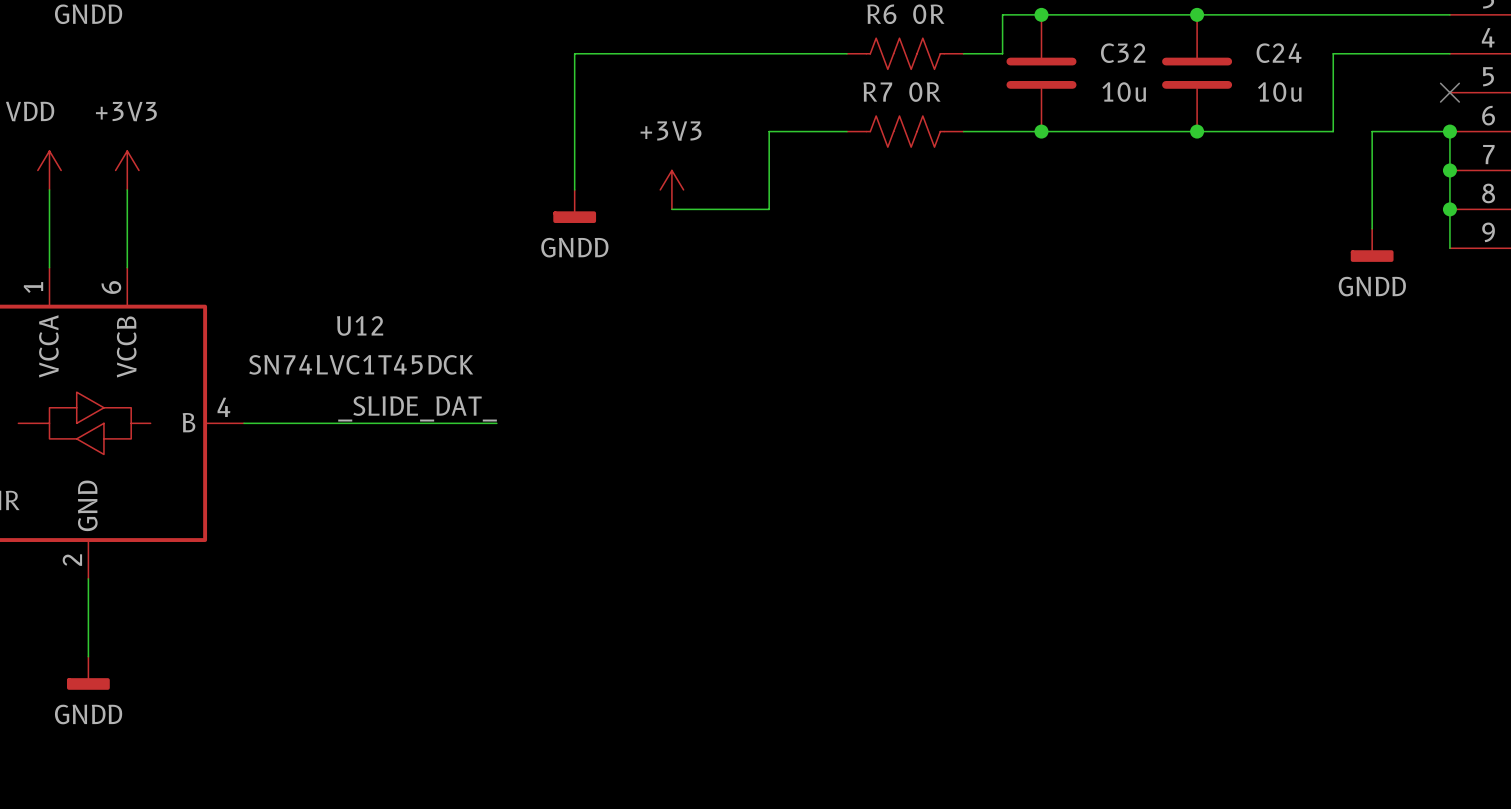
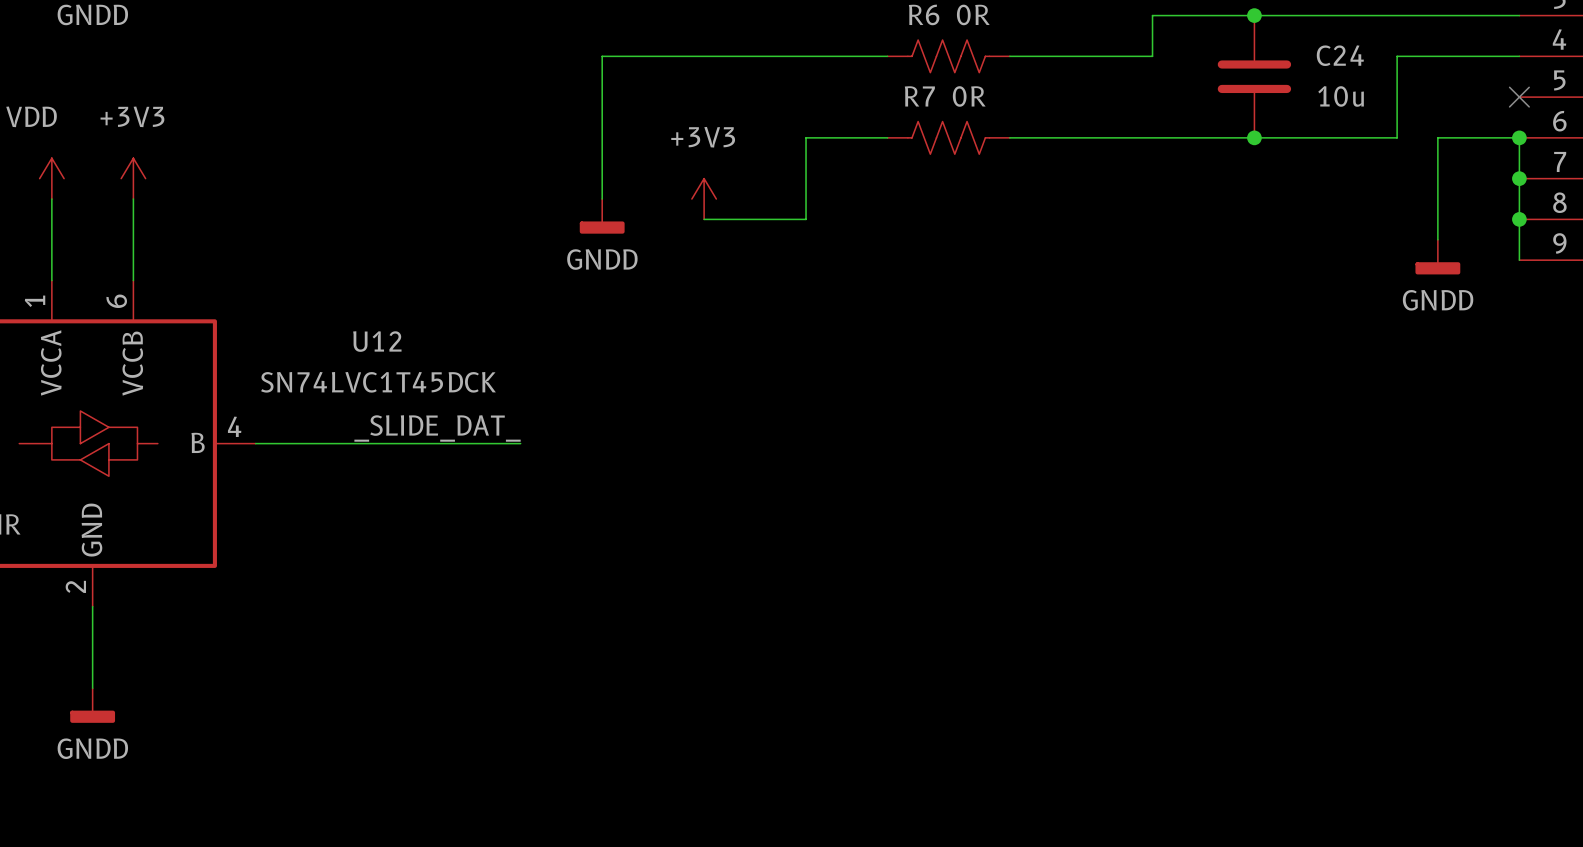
junction: (1041, 14) -> none
wire: (1099, 14) (1002, 14) (1002, 53) -> (1152, 15) (1152, 56) (1050, 56)
C32: 10u (1041, 73) -> none
junction: (1041, 131) -> none

